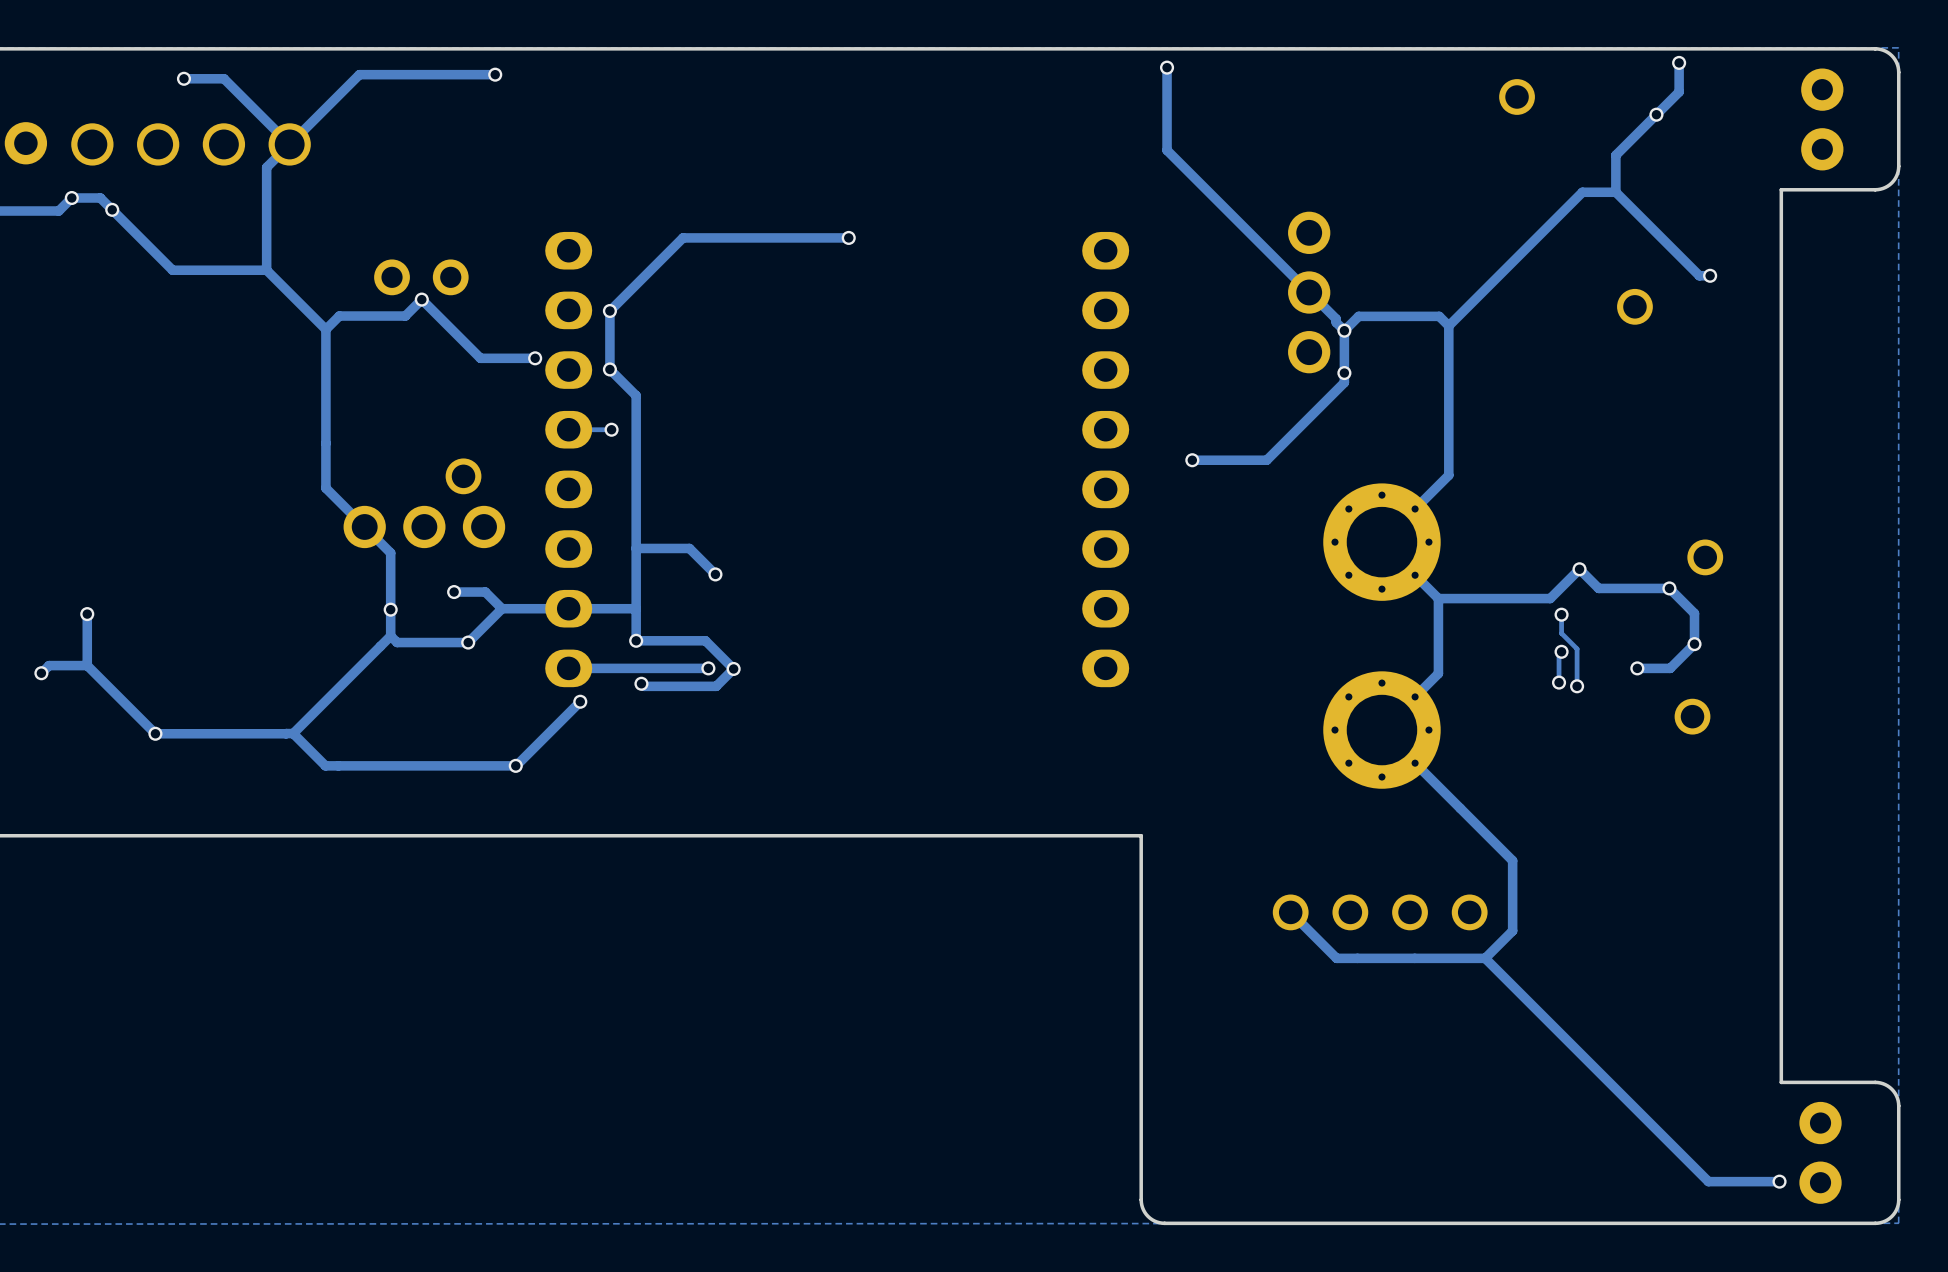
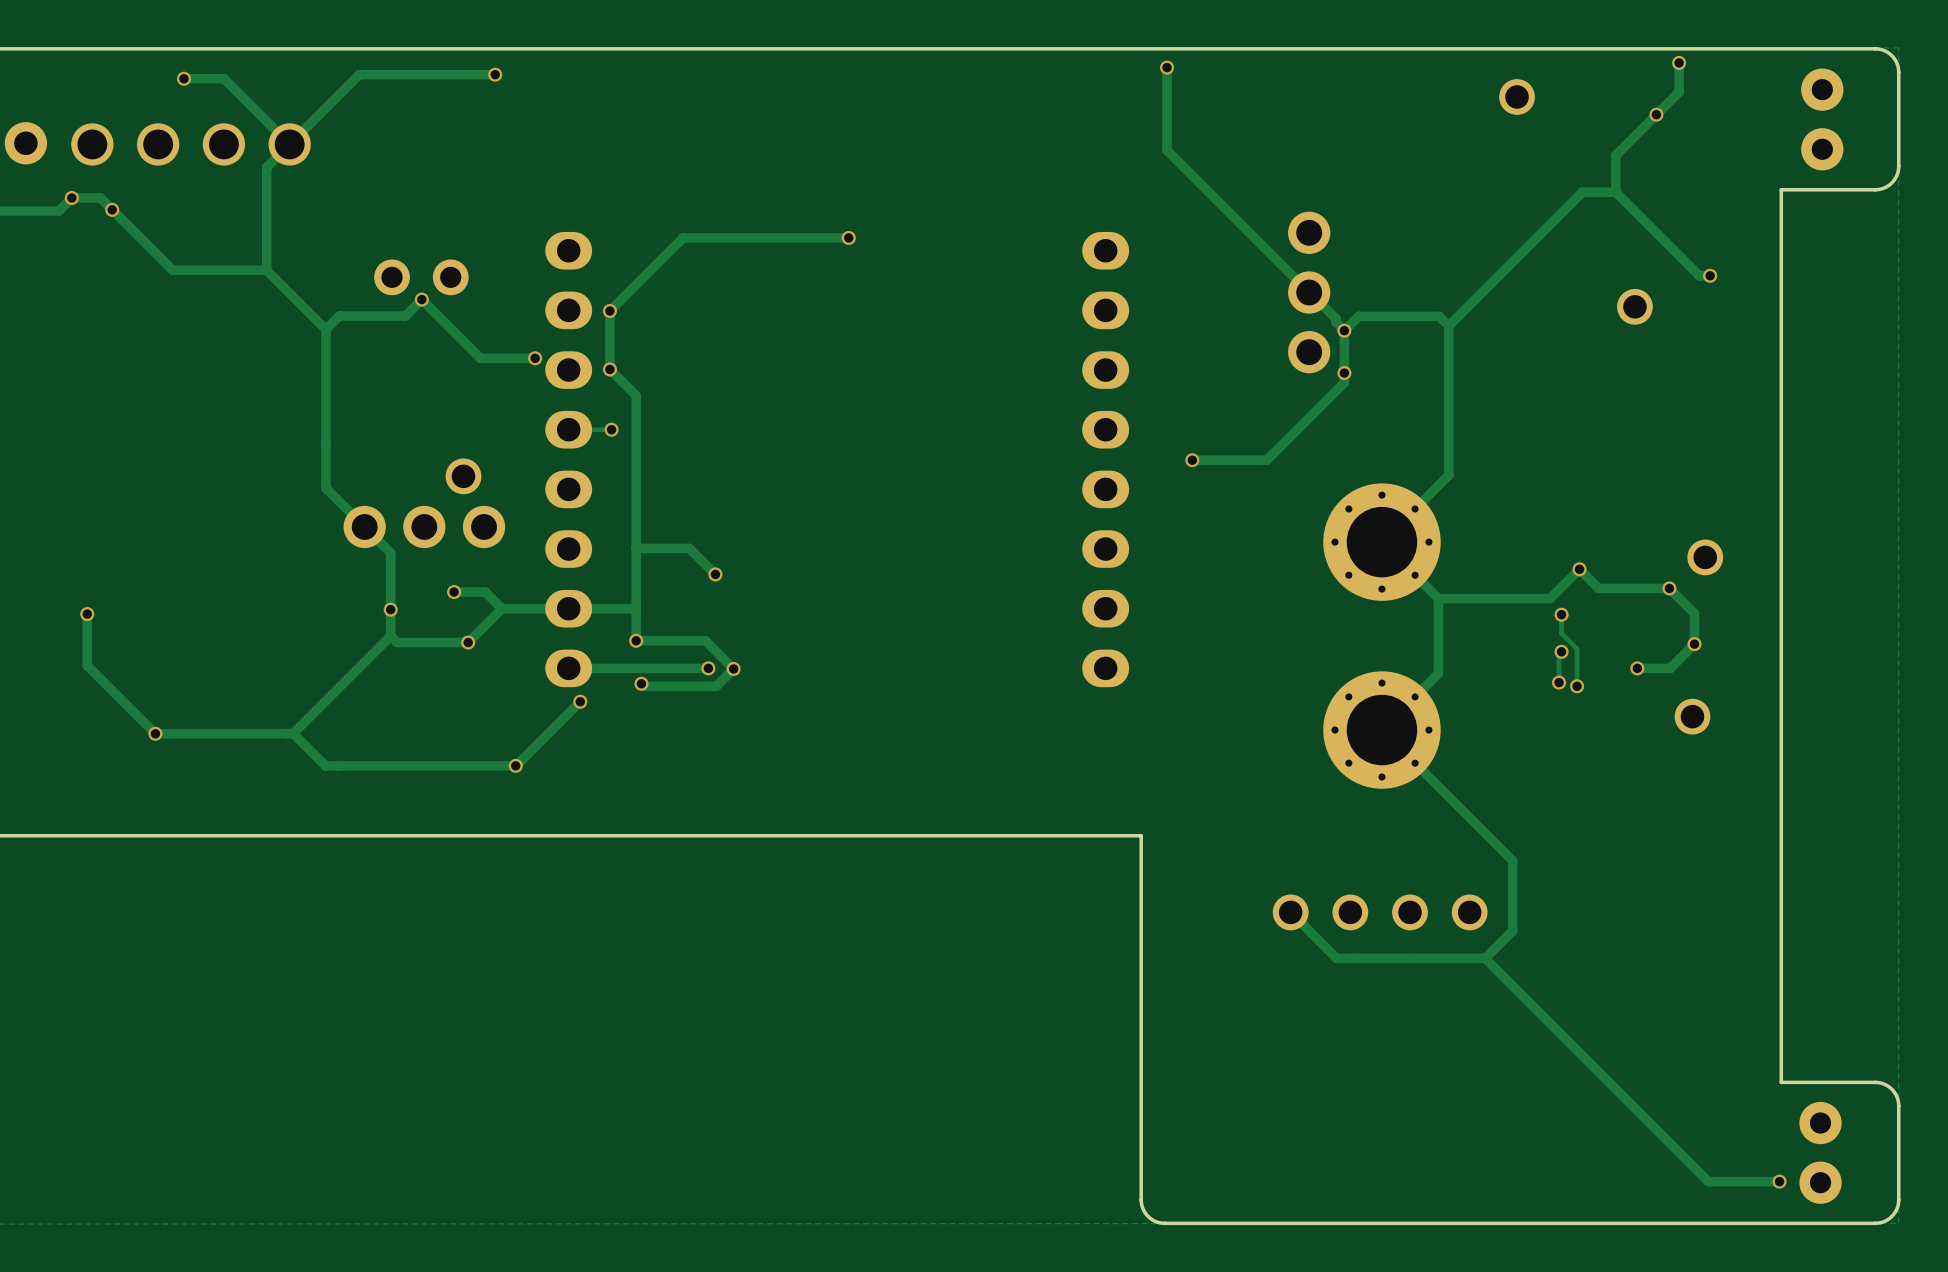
track: (87, 665) (49, 665) (41, 673) -> none
via: (41, 673) -> none

